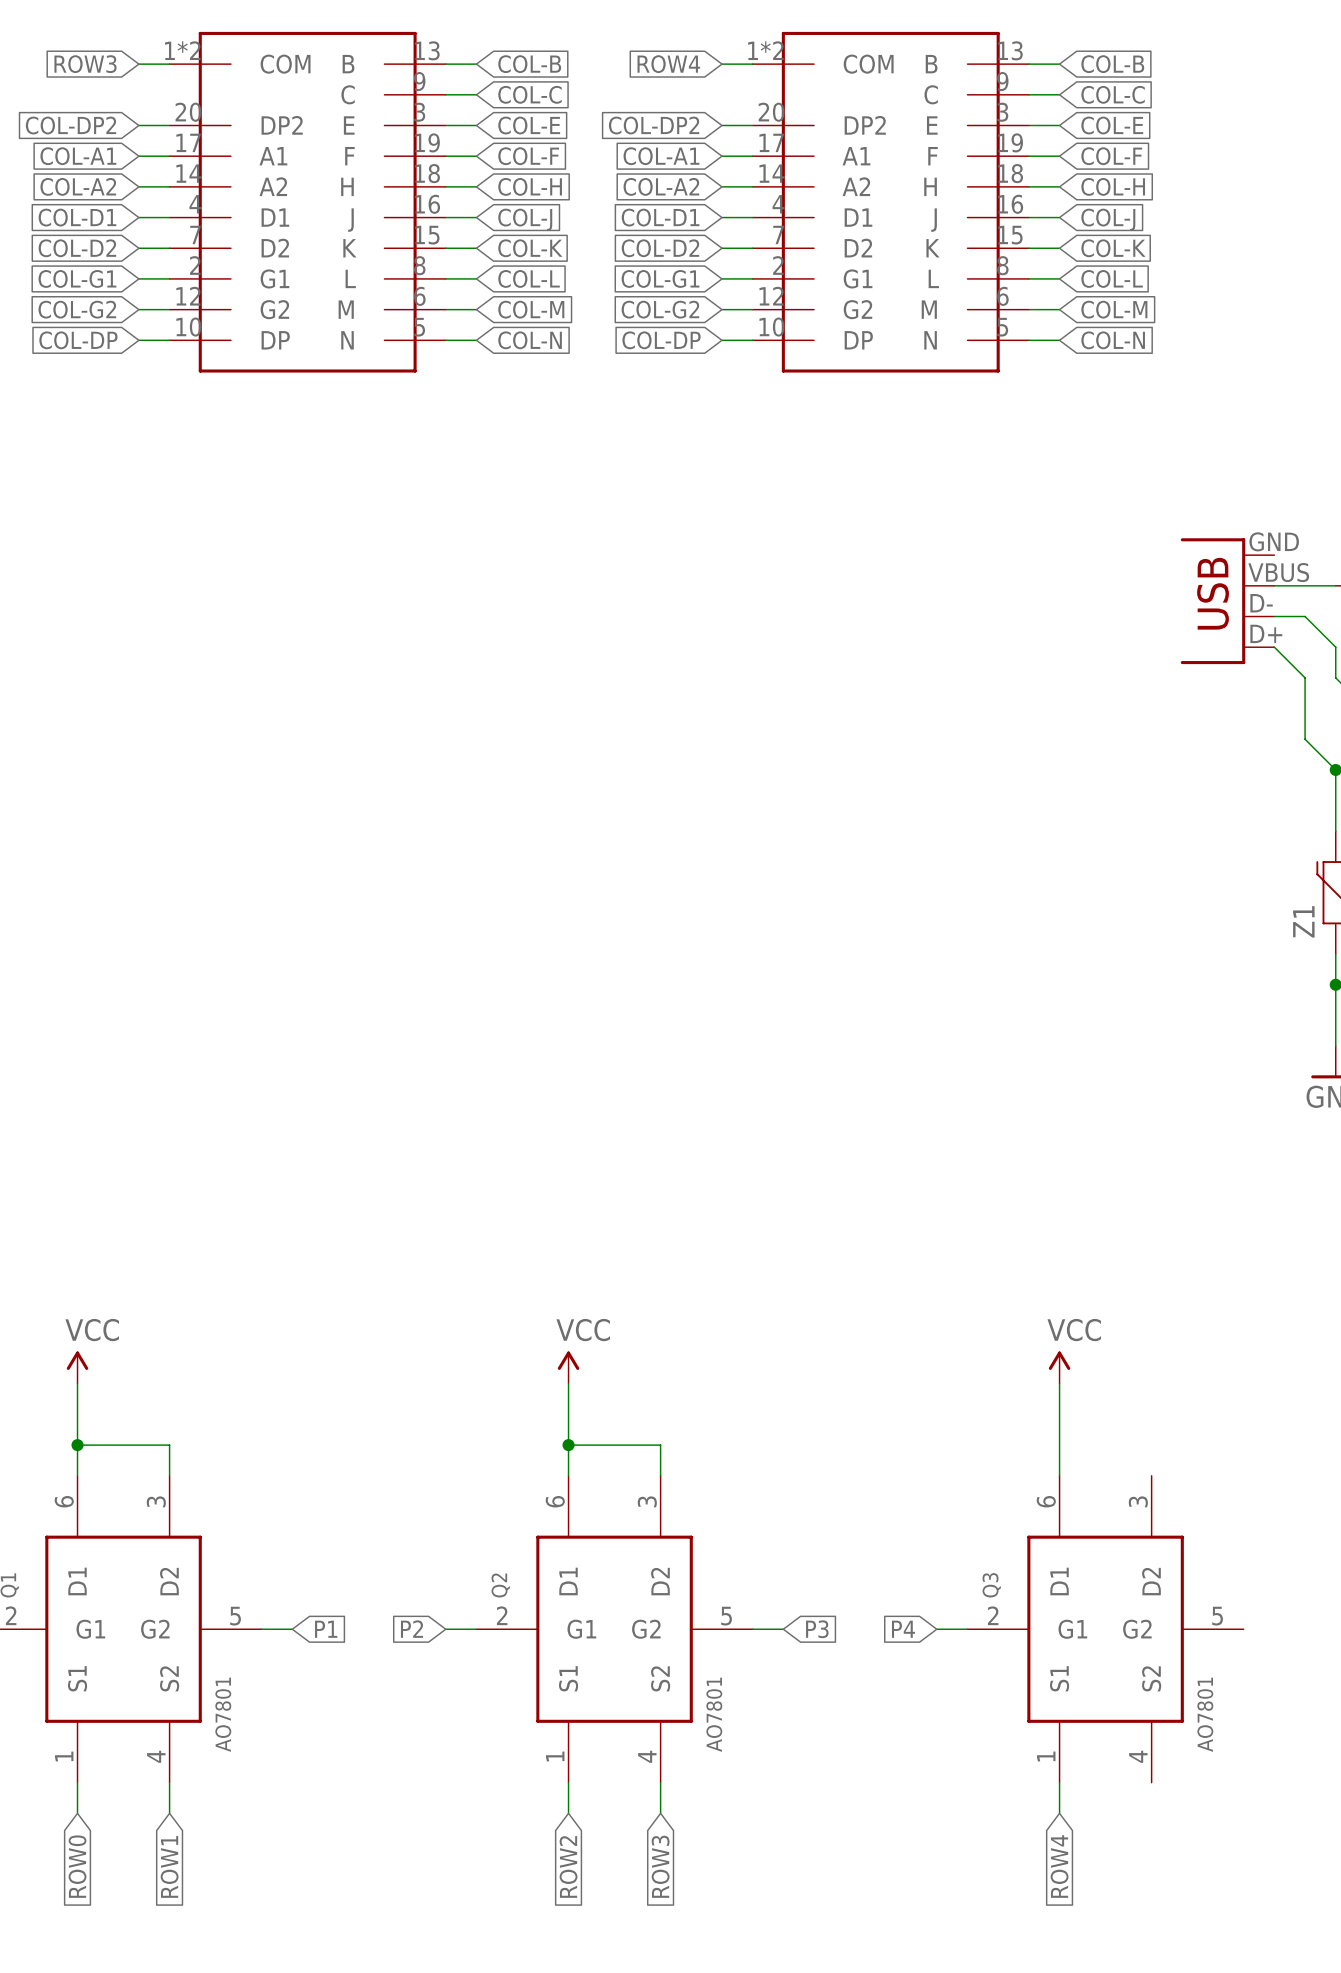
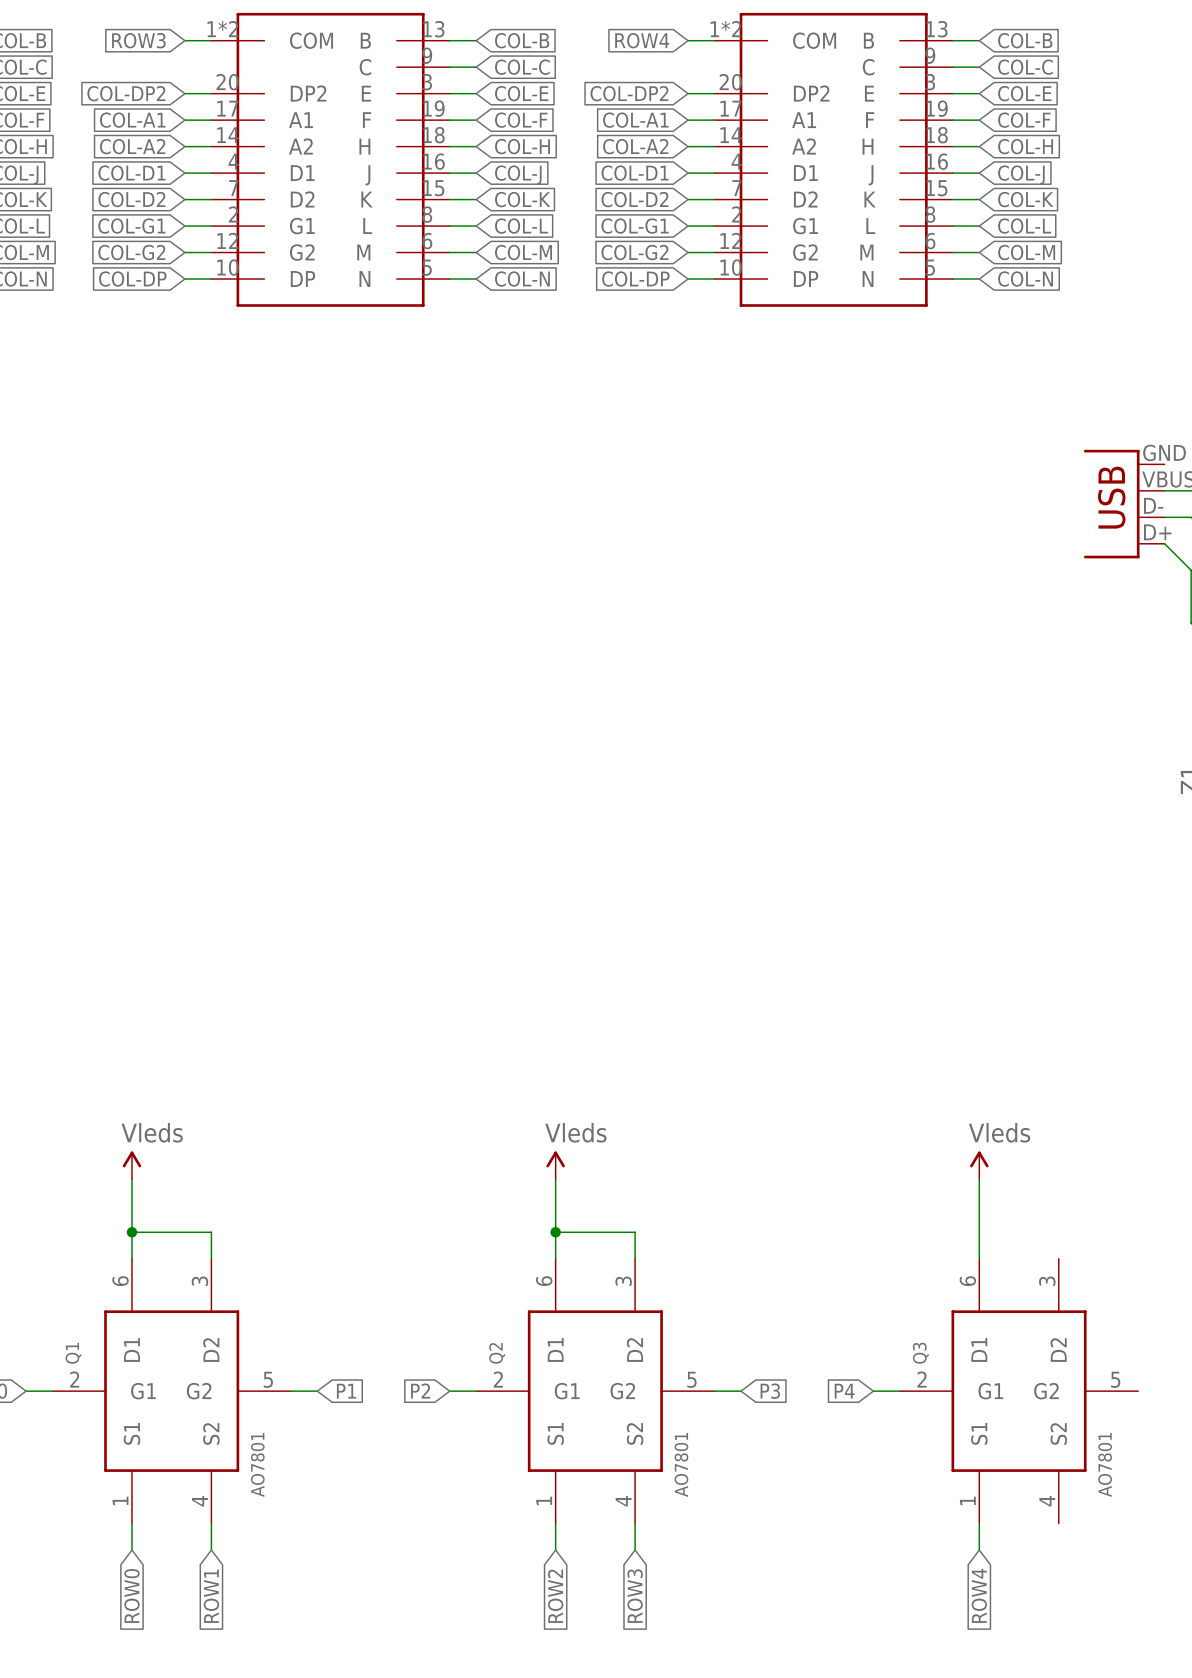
power symbol: VCC (77, 1367) -> Vleds (131, 1165)
power symbol: VCC (568, 1367) -> Vleds (555, 1165)
power symbol: VCC (1059, 1367) -> Vleds (979, 1165)

